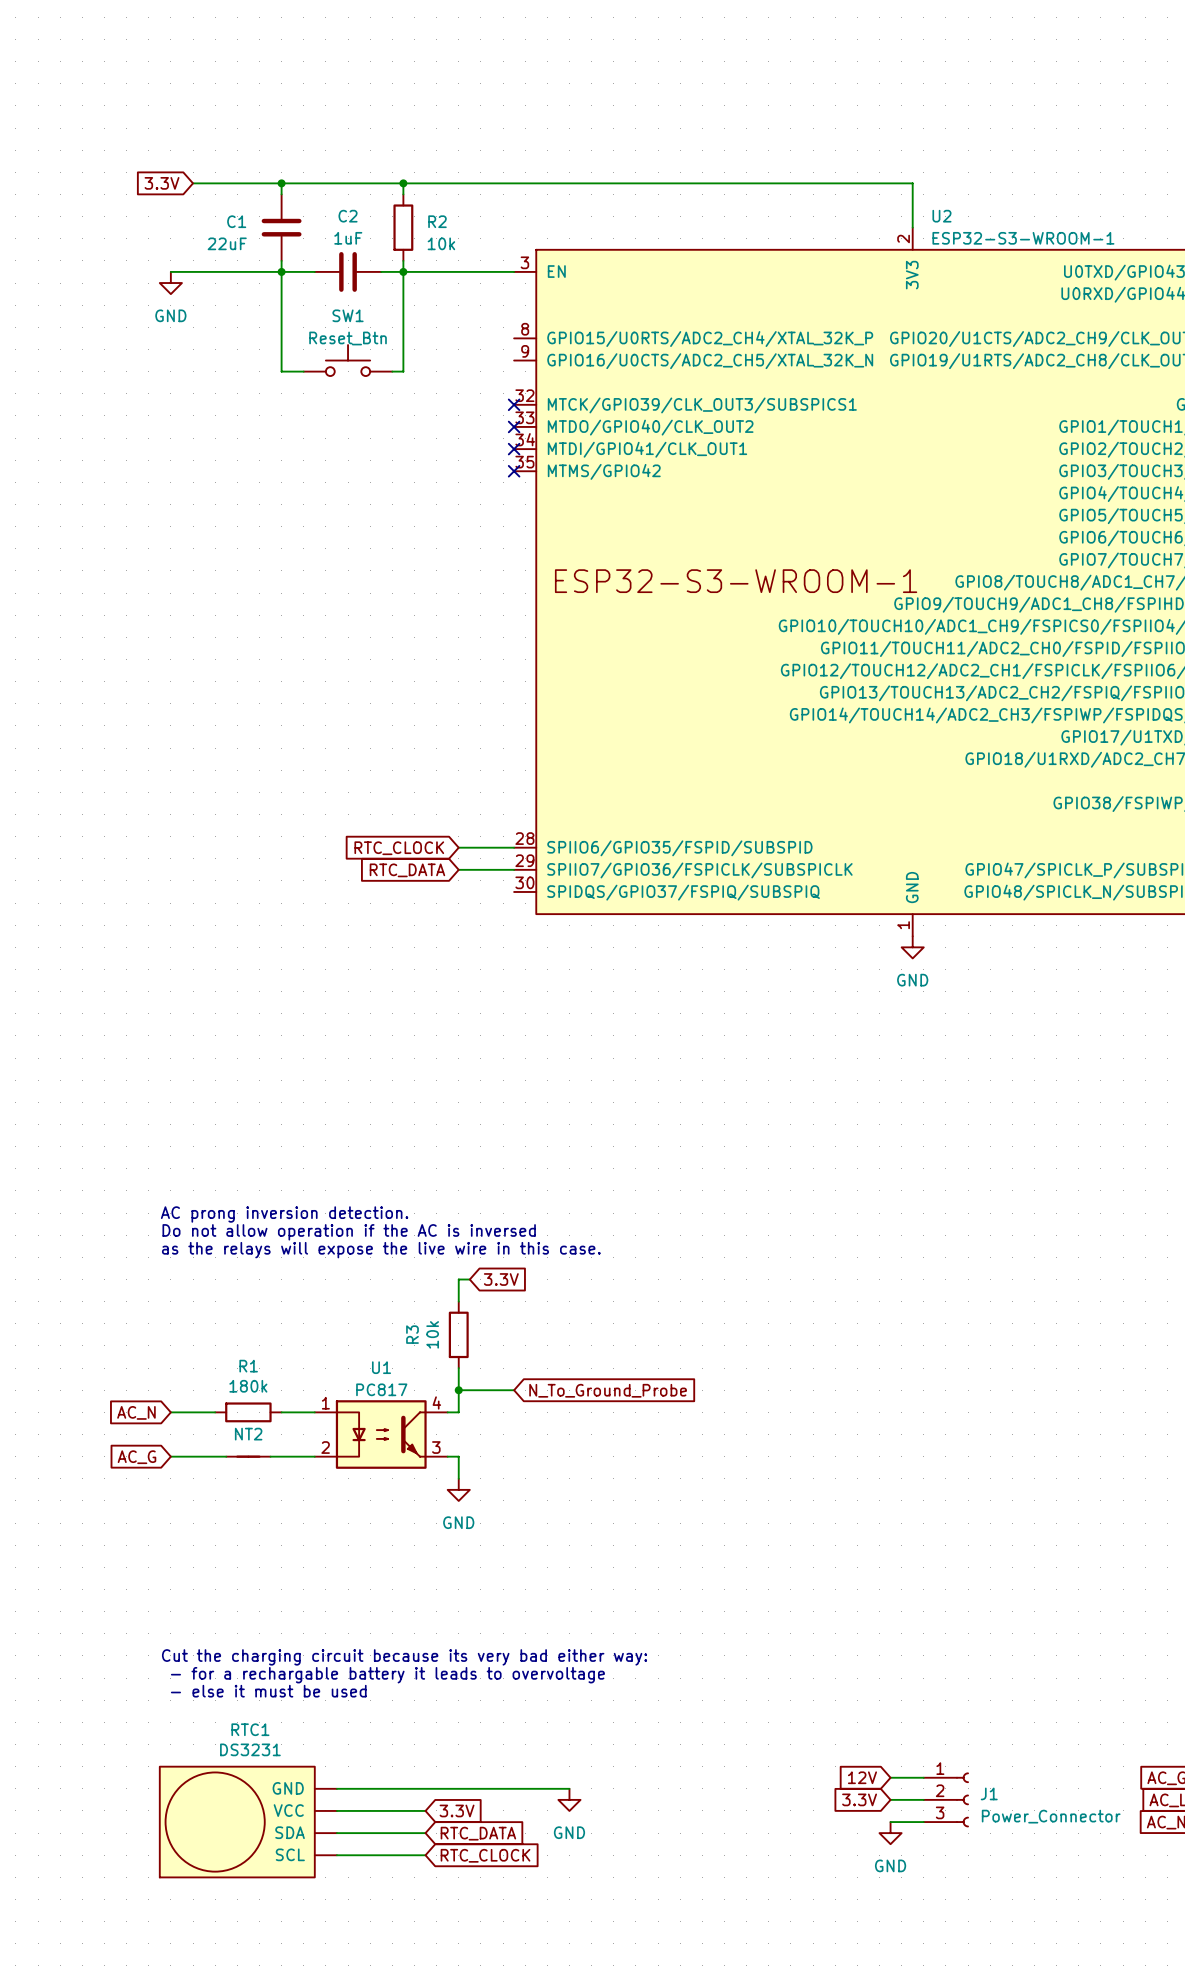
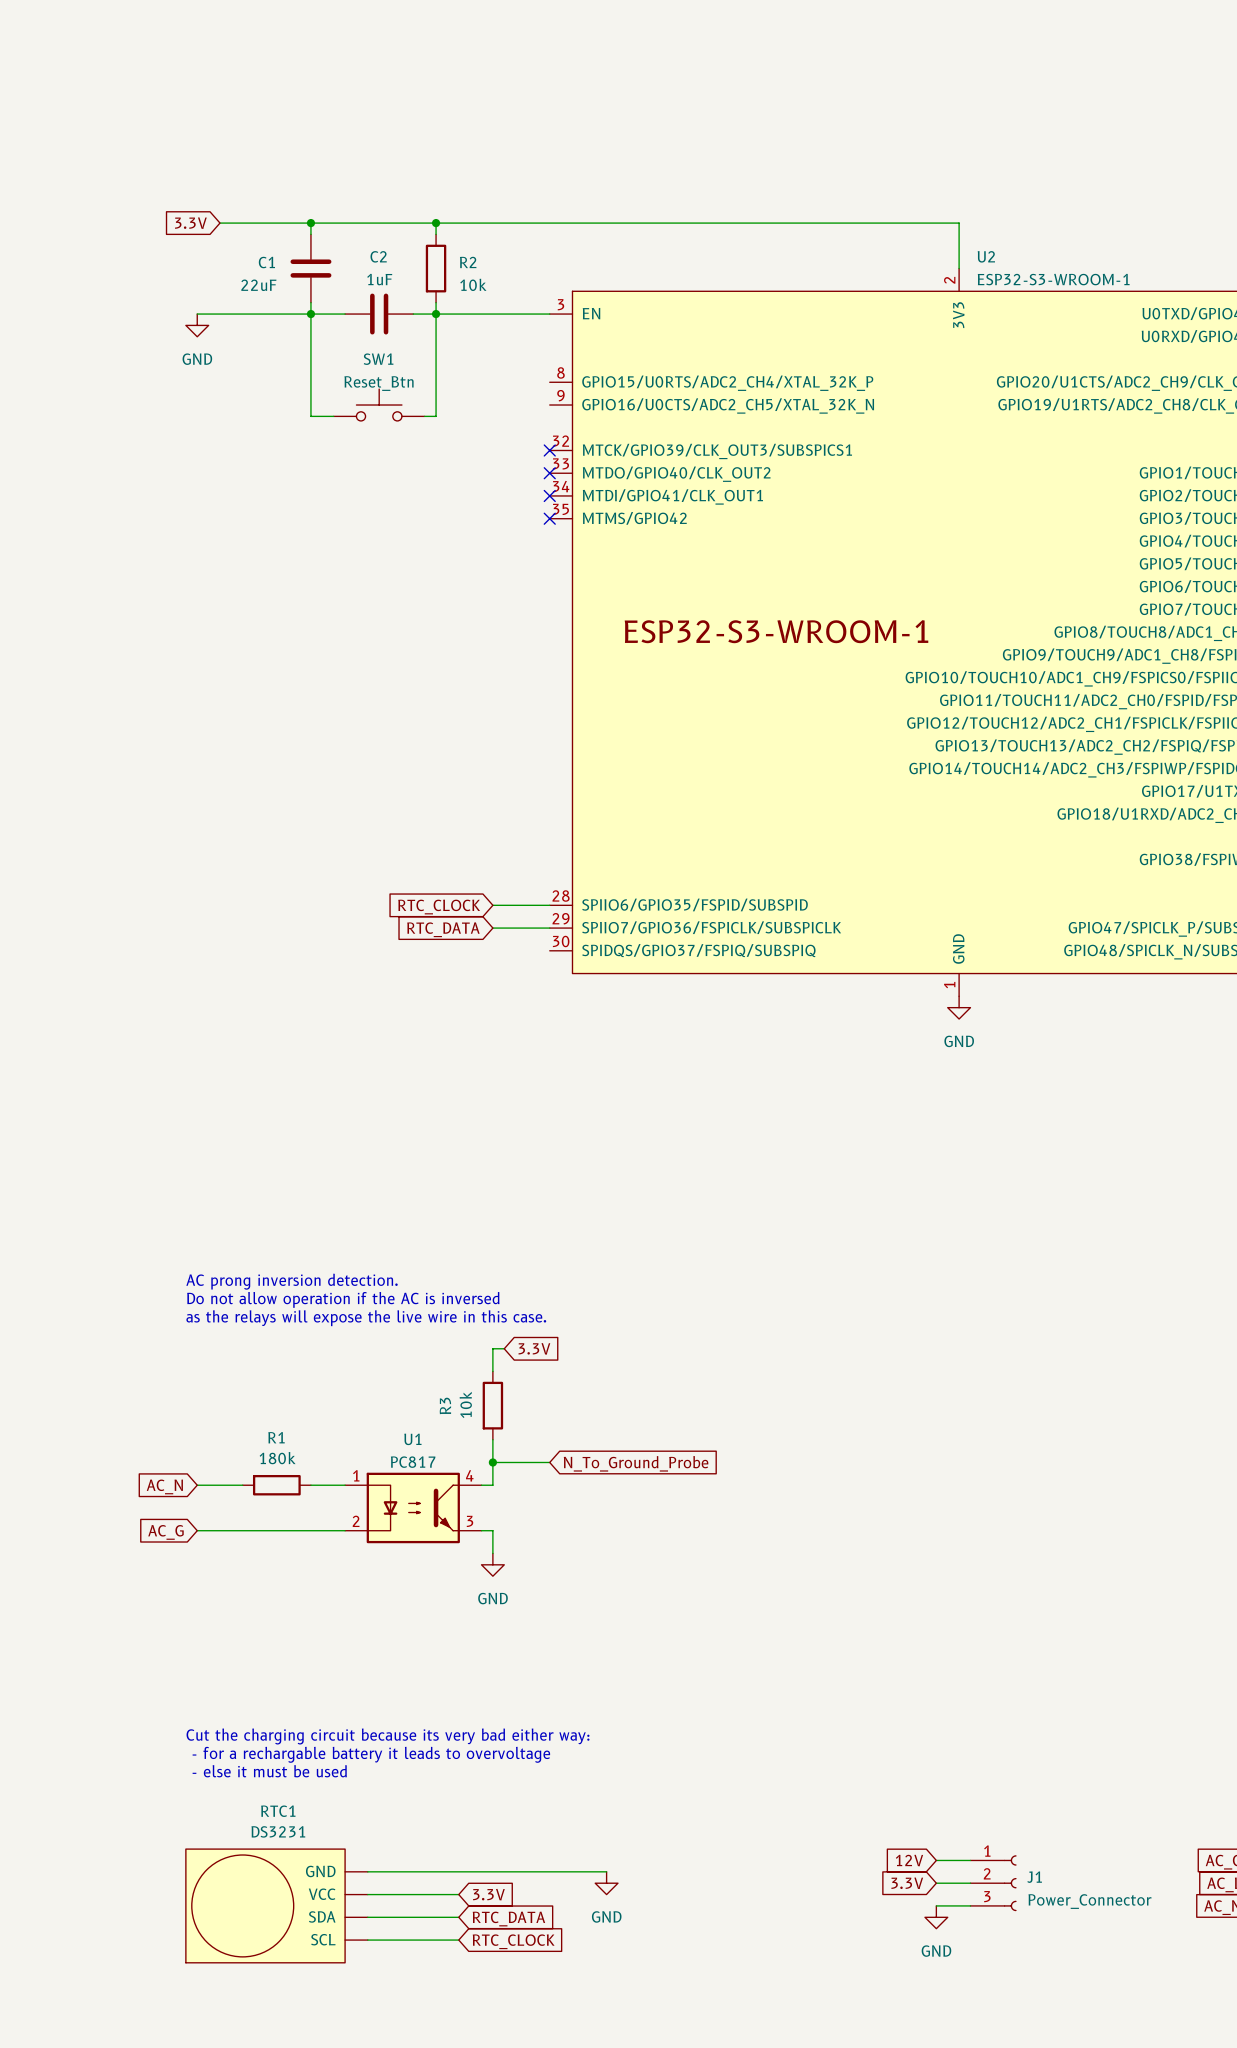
NT2: (248, 1456) -> none

